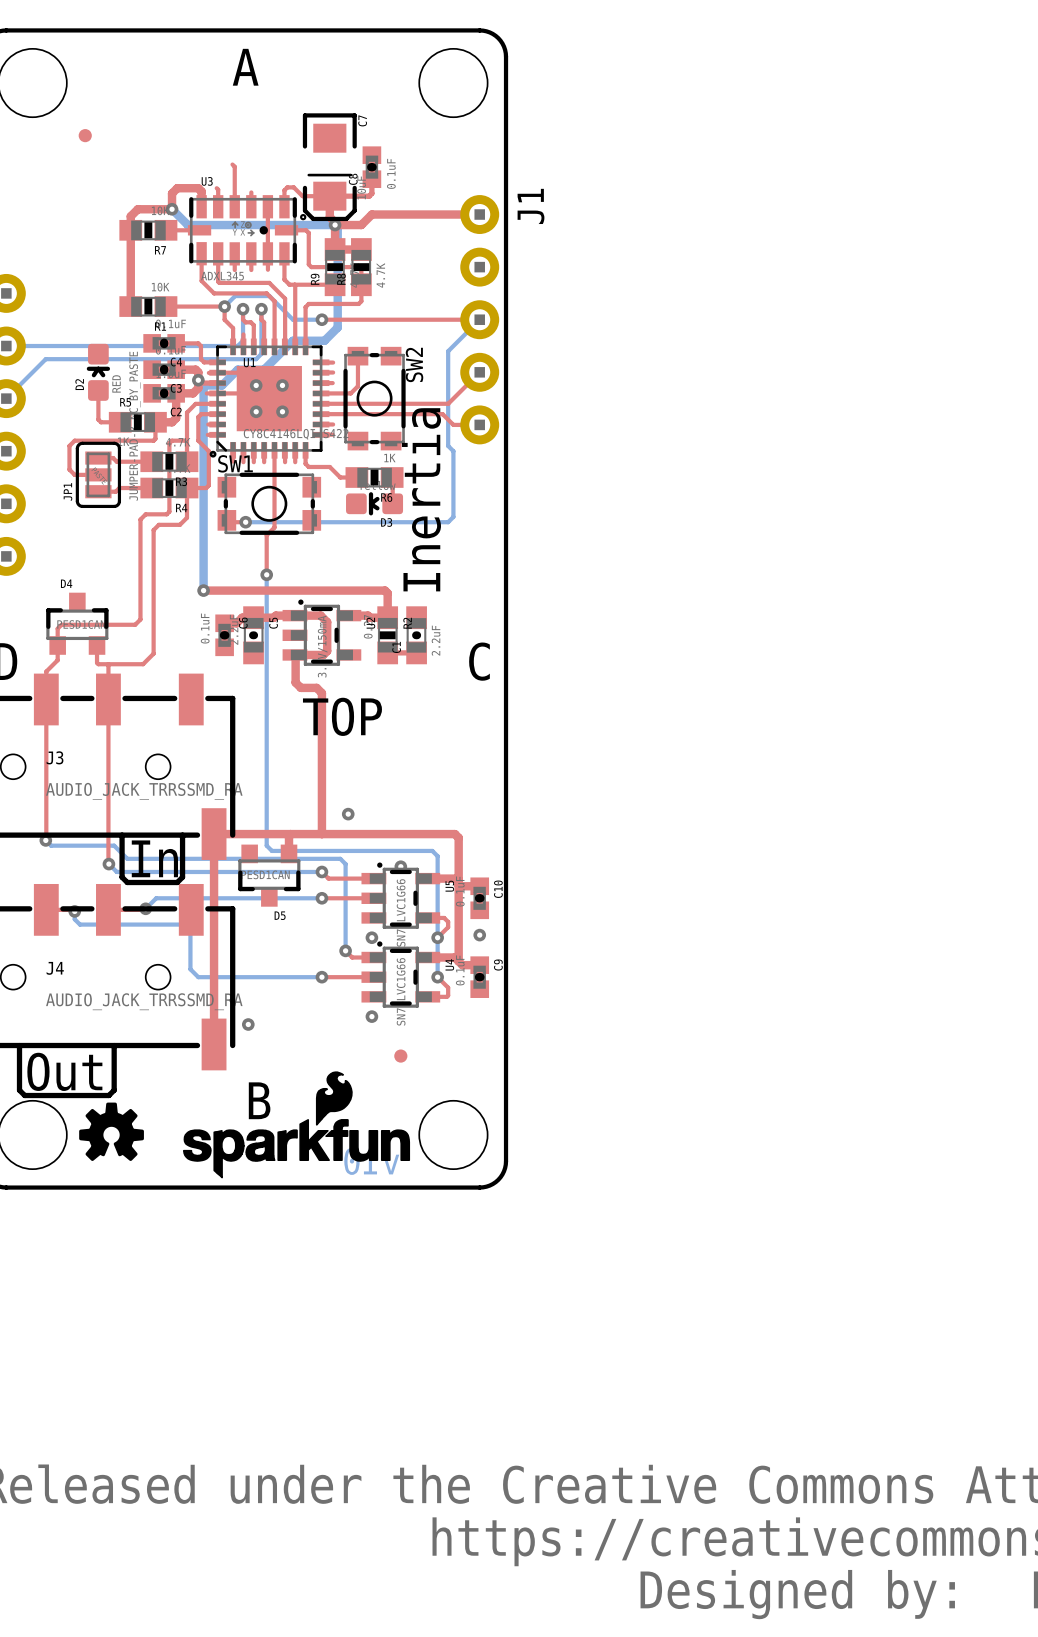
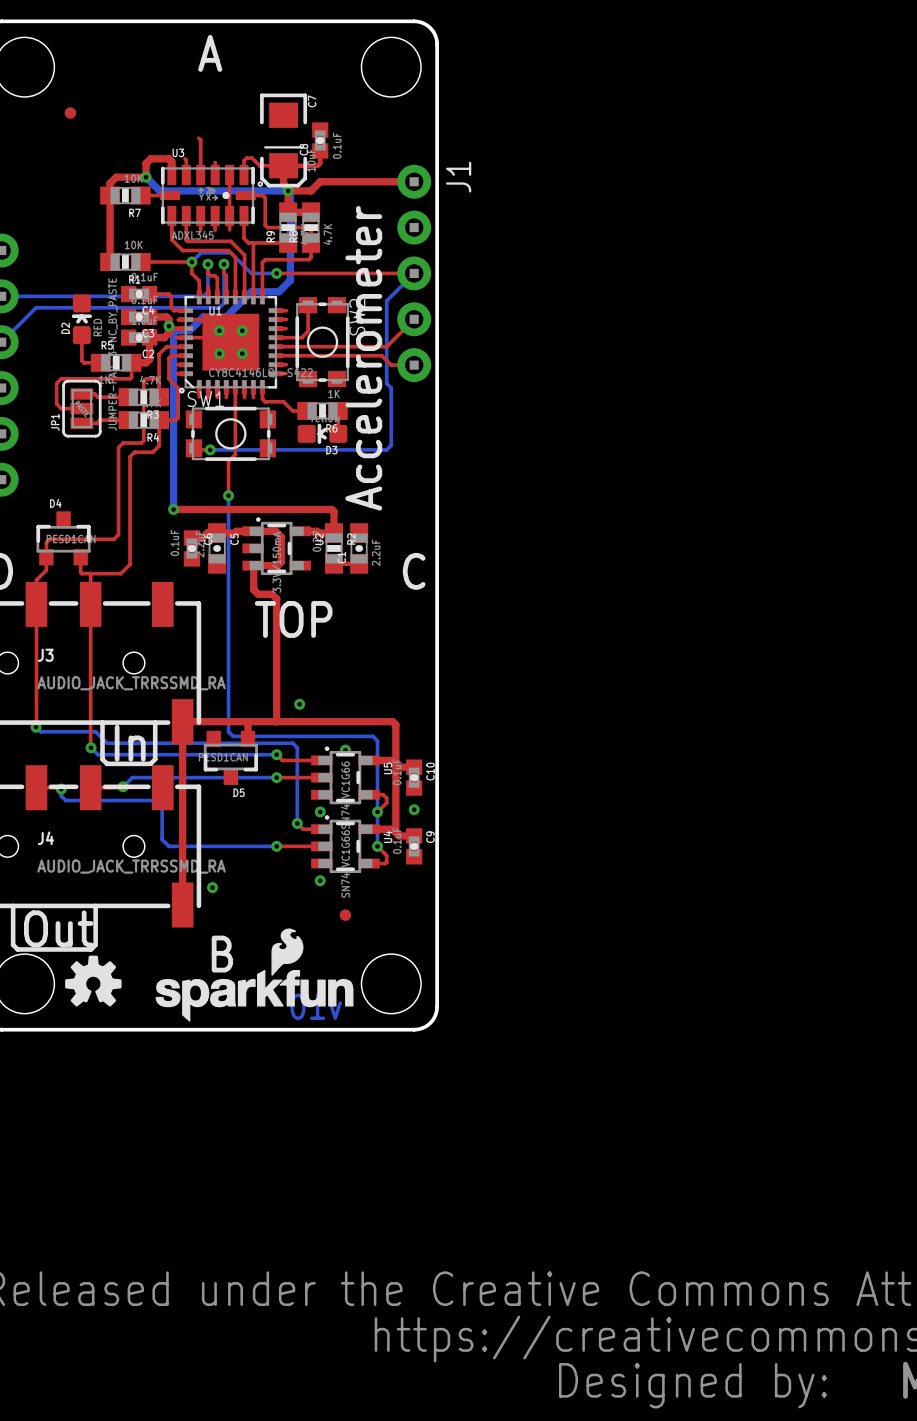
text: Inertia (421, 499) -> Accelerometer (363, 358)

